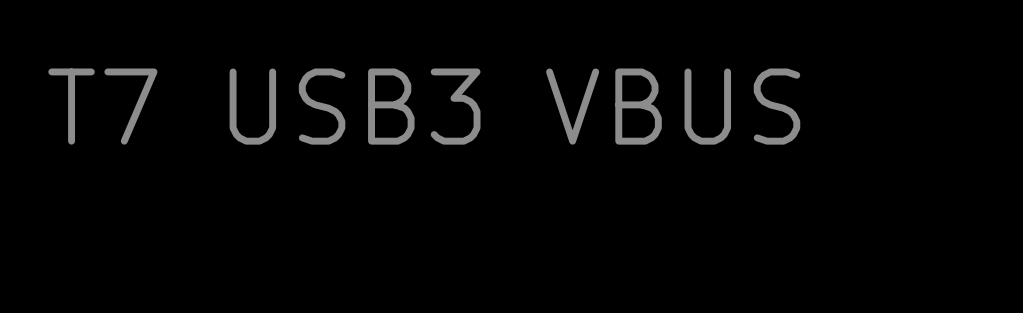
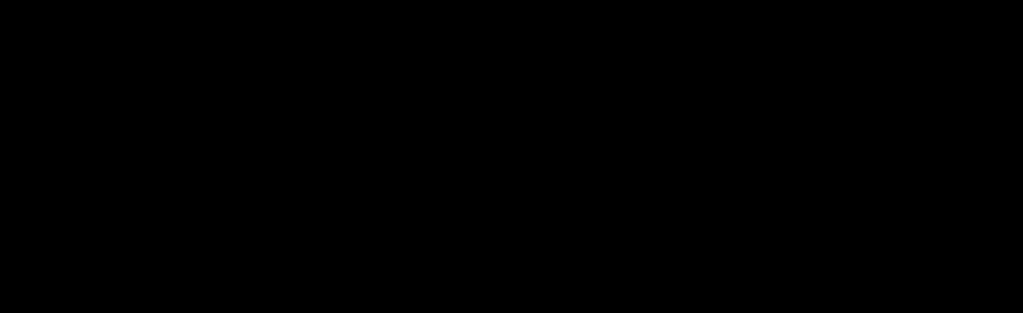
text: T7 USB3 VBUS (424, 106) -> none

